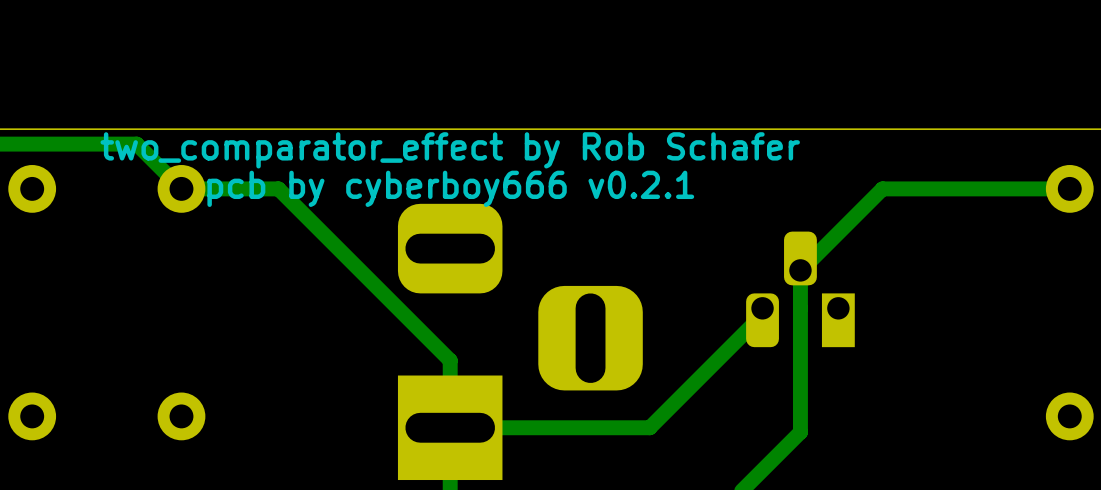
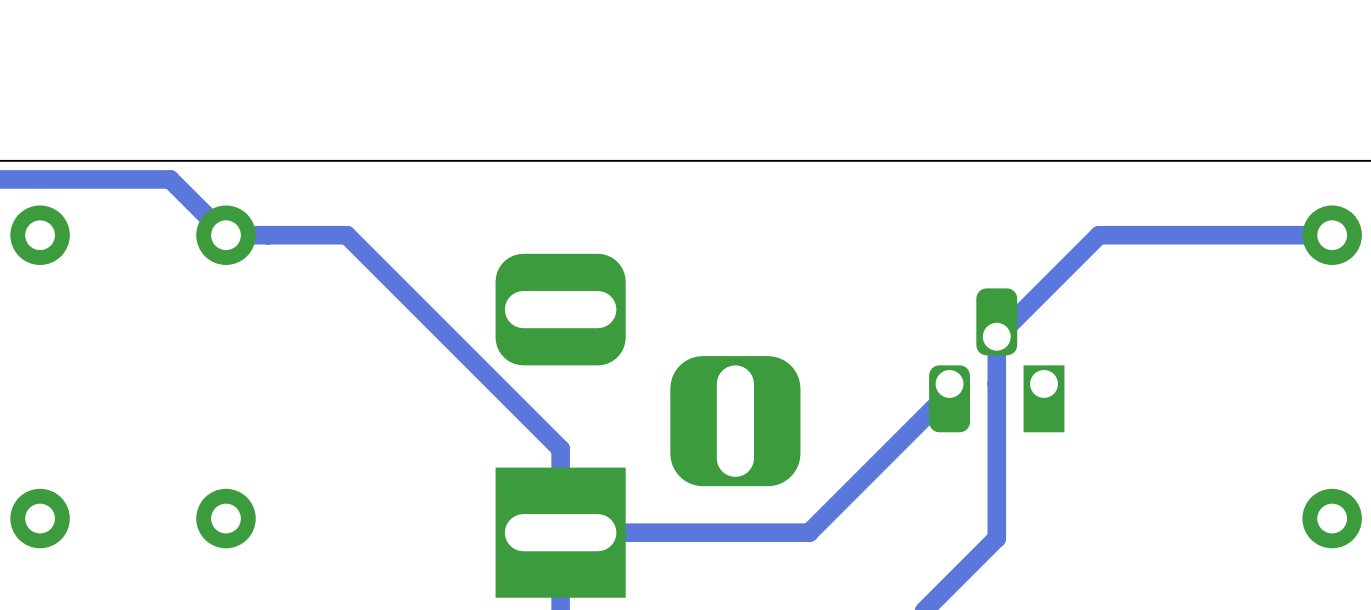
text: two_comparator_effect by Rob Schafer (450, 150) -> none
text: pcb by cyberboy666 v0.2.1 (450, 188) -> none

